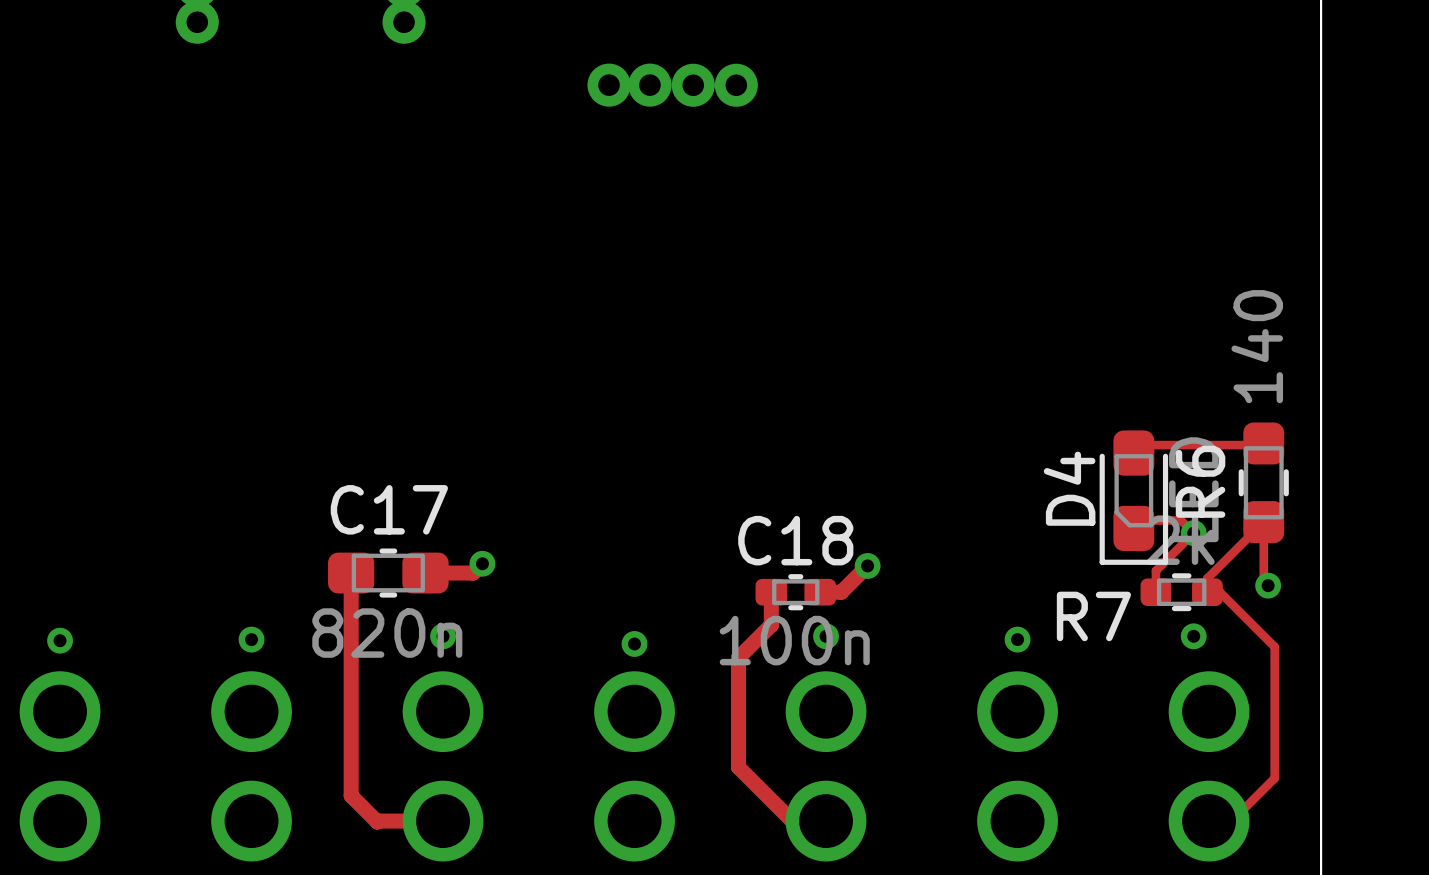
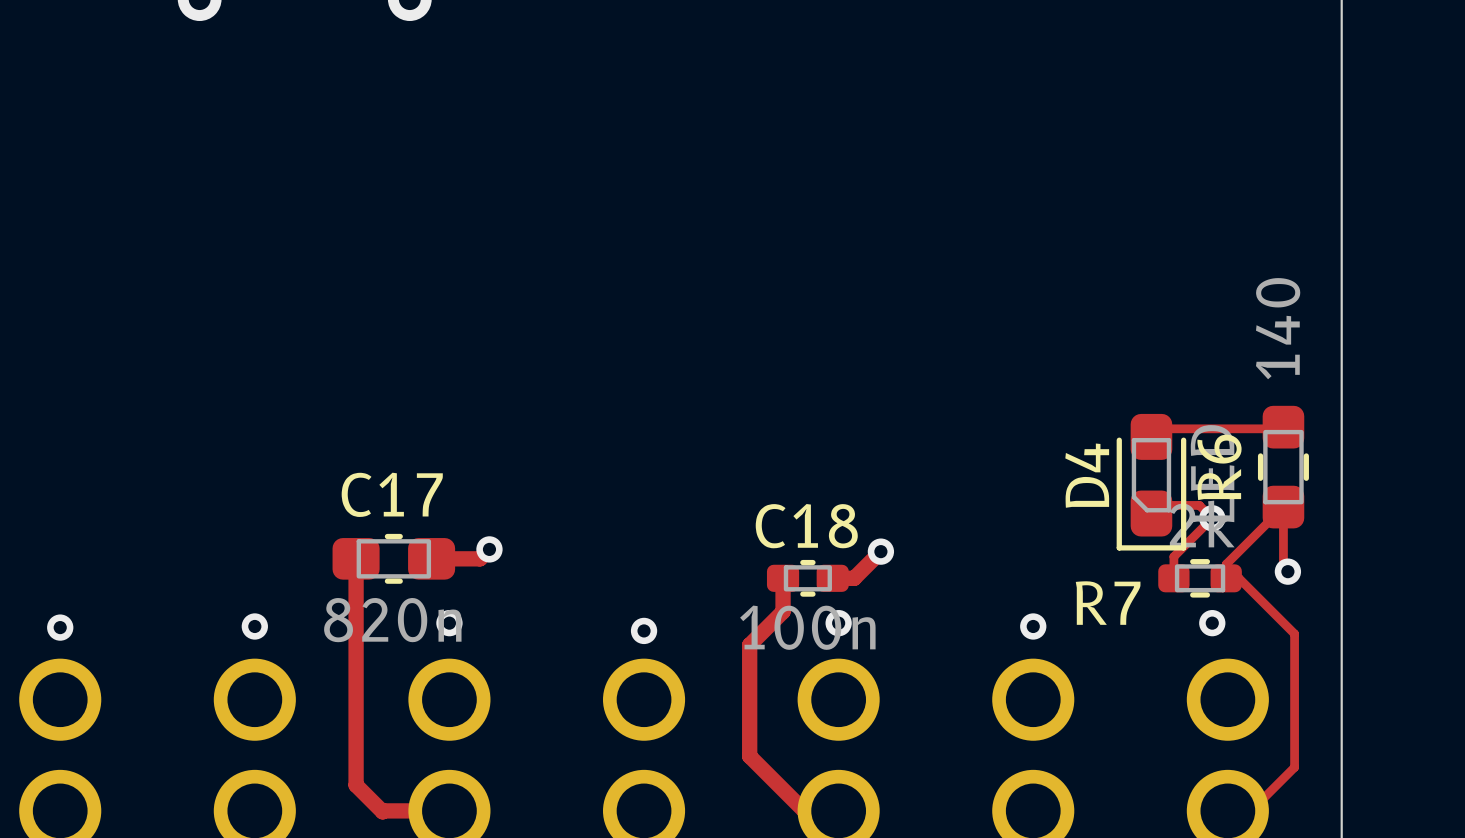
via: (609, 85) -> none
via: (649, 85) -> none
via: (693, 85) -> none
via: (736, 85) -> none

